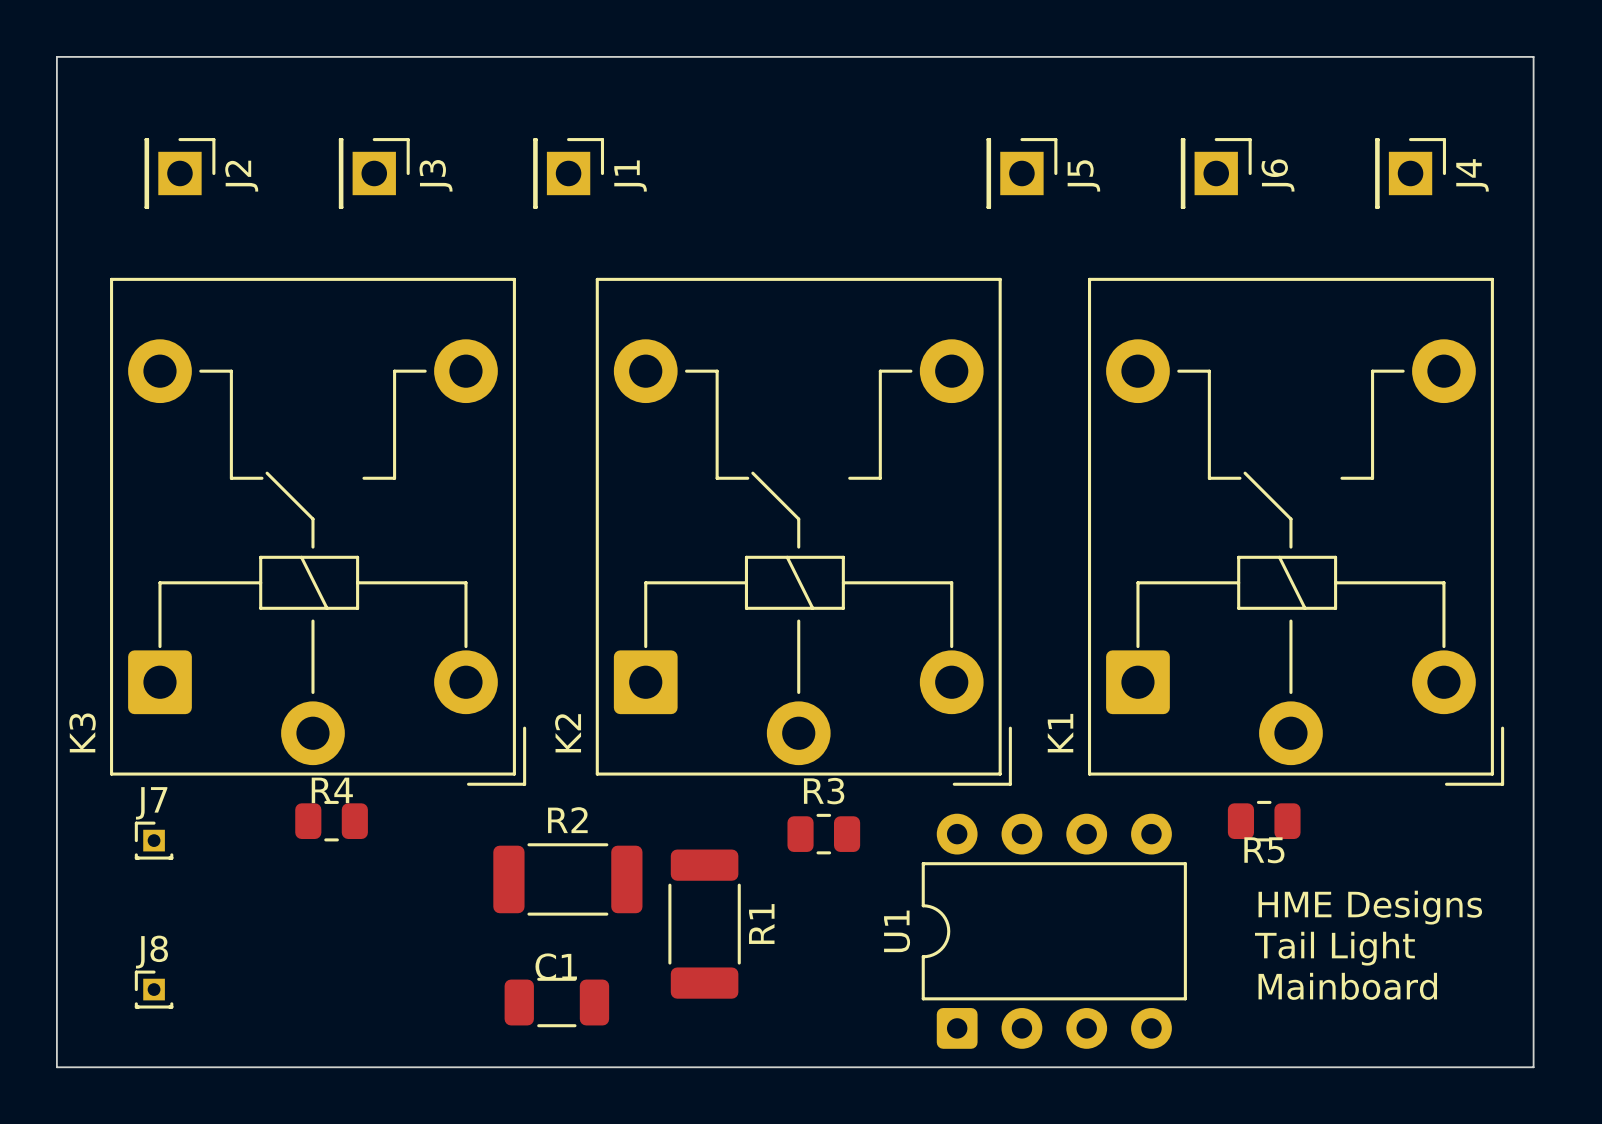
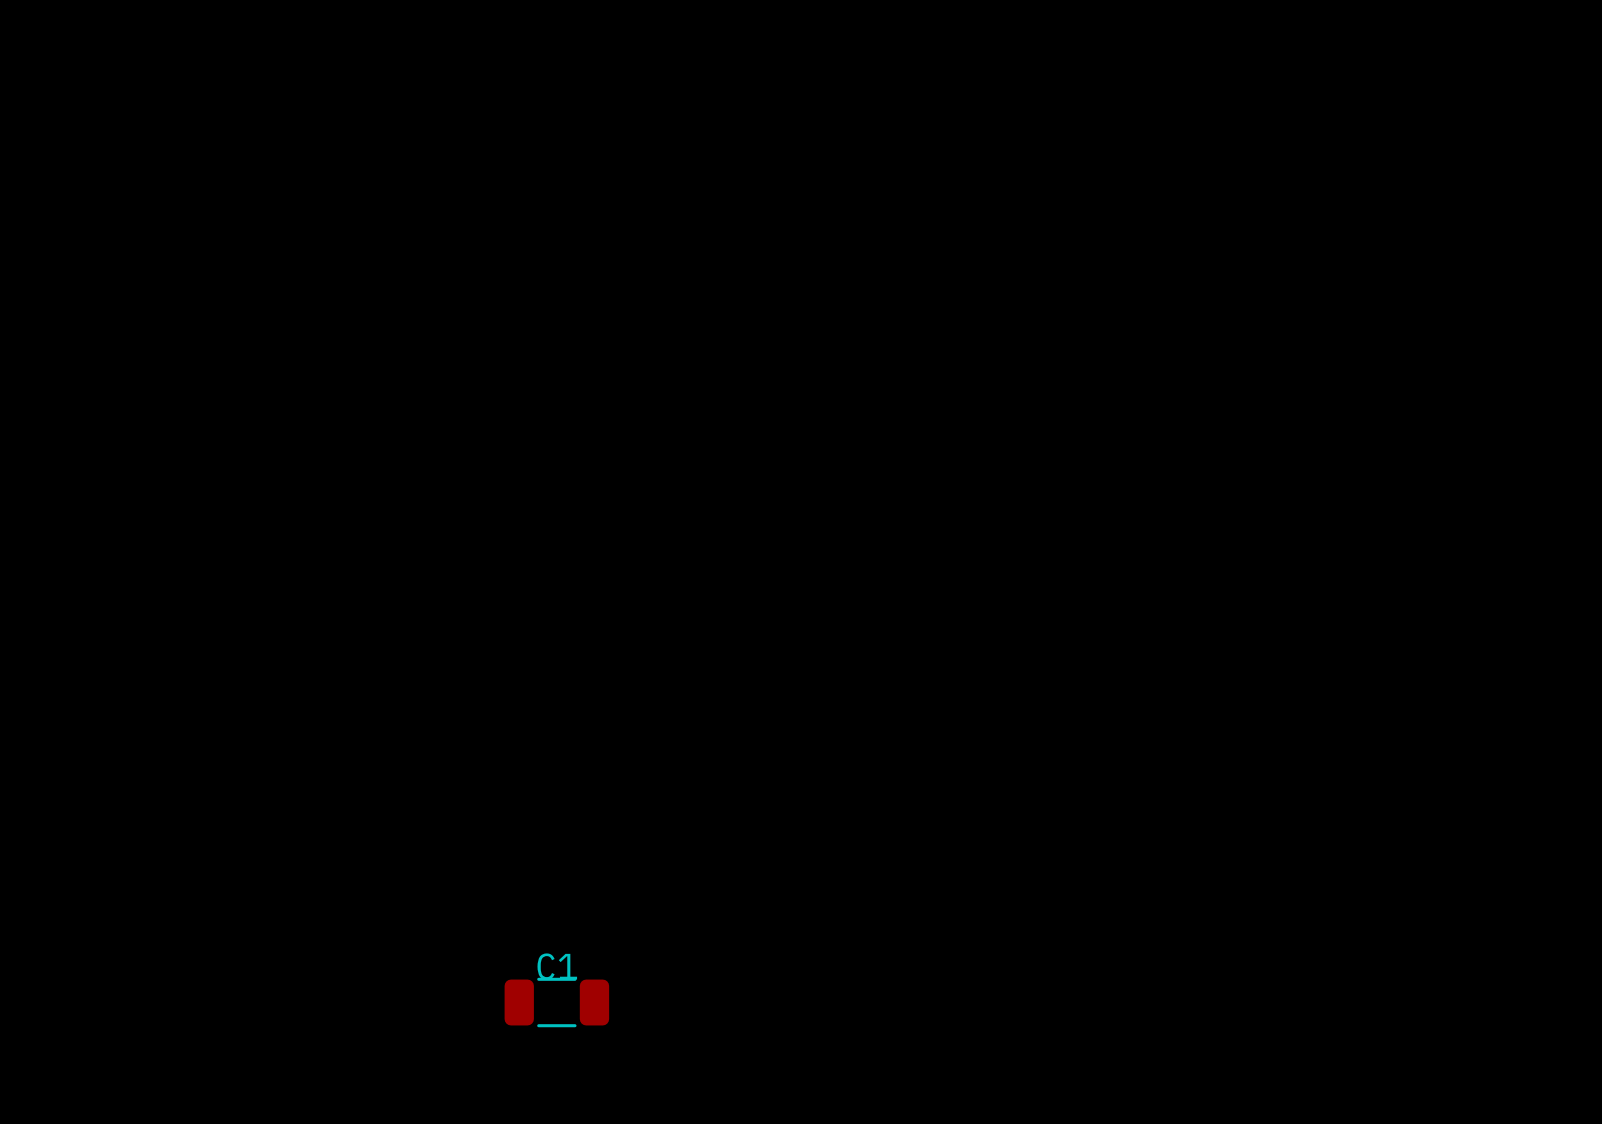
board edge: (56, 56) (1533, 56) (1533, 1067) (56, 1067) (56, 56) -> none
J2: (179, 173) -> none
J3: (374, 173) -> none
J1: (568, 173) -> none
J5: (1021, 173) -> none
J6: (1216, 173) -> none
J4: (1410, 173) -> none
K3: (318, 531) -> none
K2: (803, 531) -> none
K1: (1296, 531) -> none
R4: (331, 821) -> none
R5: (1264, 821) -> none
R3: (823, 834) -> none
J7: (154, 840) -> none
R2: (567, 879) -> none
text: HME Designs (1370, 907) -> none
R1: (704, 924) -> none
U1: (1054, 931) -> none
text: Tail Light (1334, 948) -> none
text: Mainboard (1347, 986) -> none
J8: (154, 989) -> none

